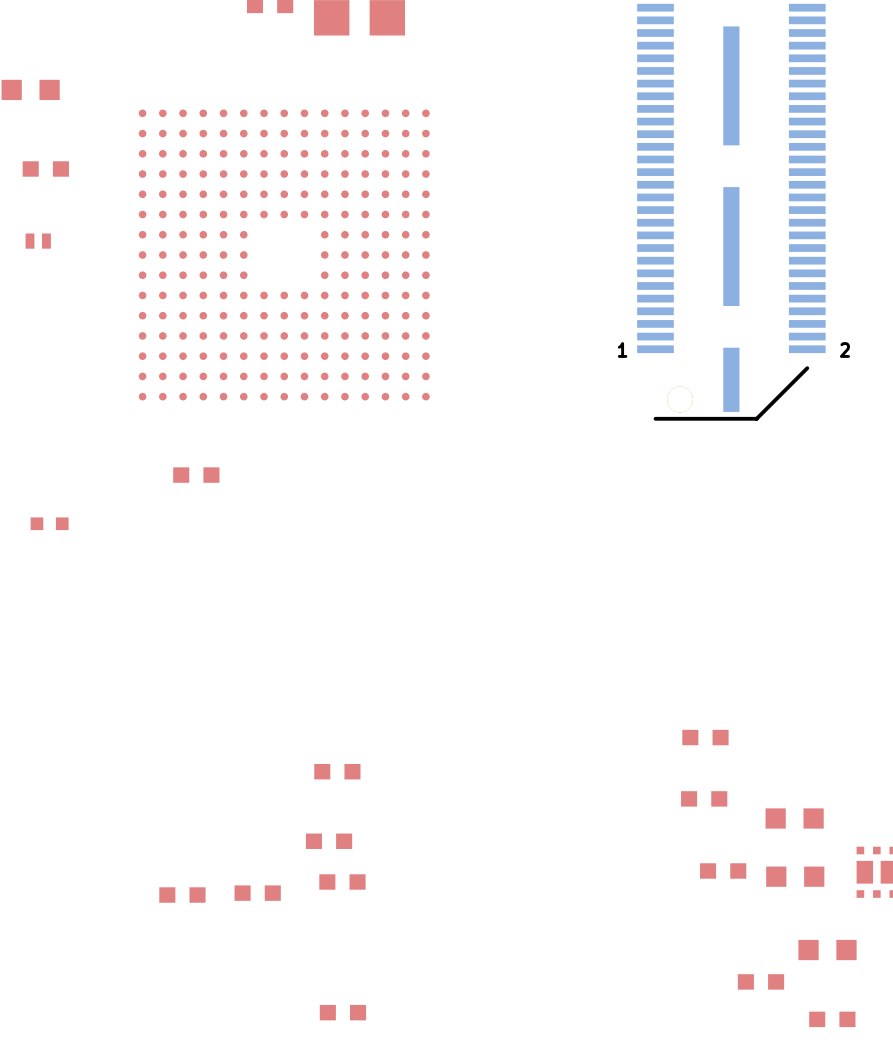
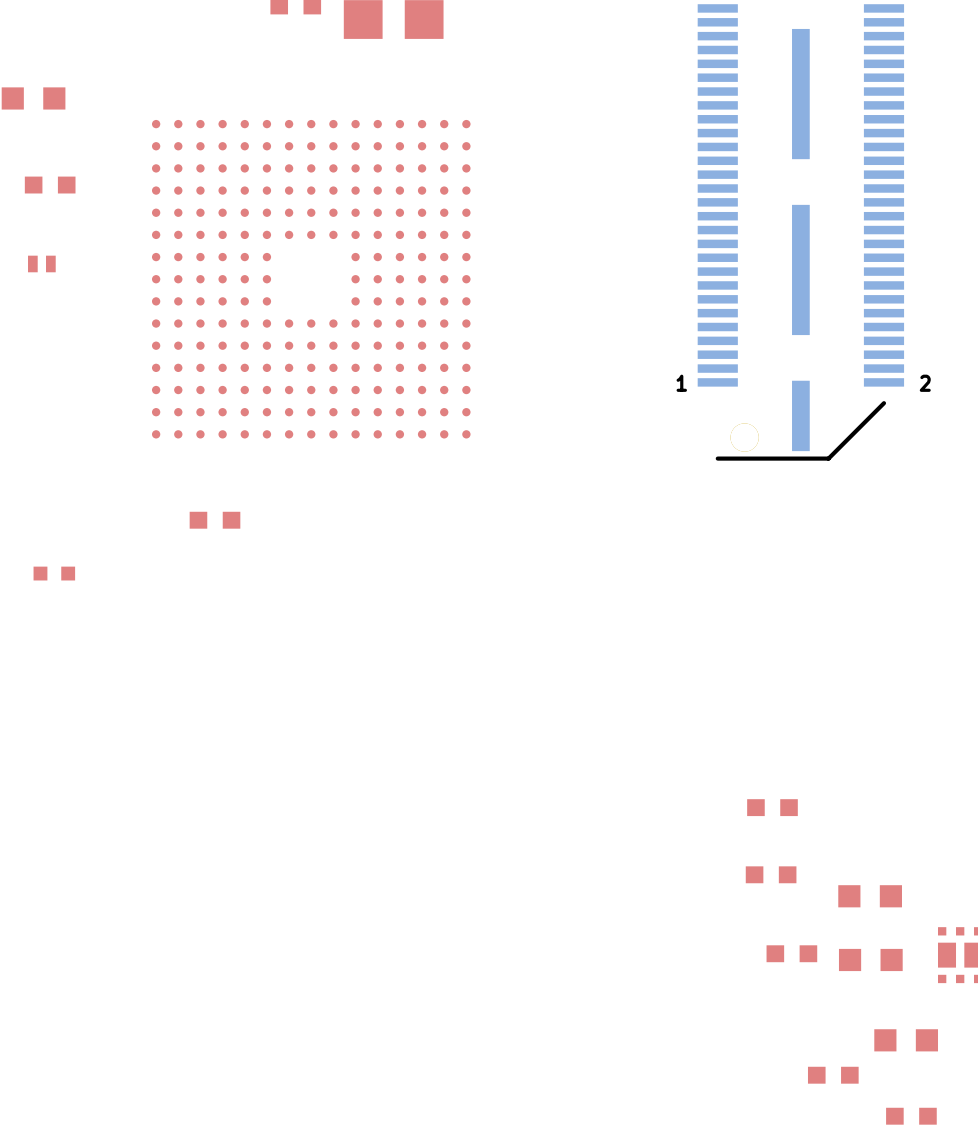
part: (337, 771) -> none
part: (329, 841) -> none
part: (342, 881) -> none
part: (257, 893) -> none
part: (182, 895) -> none
part: (342, 1012) -> none

